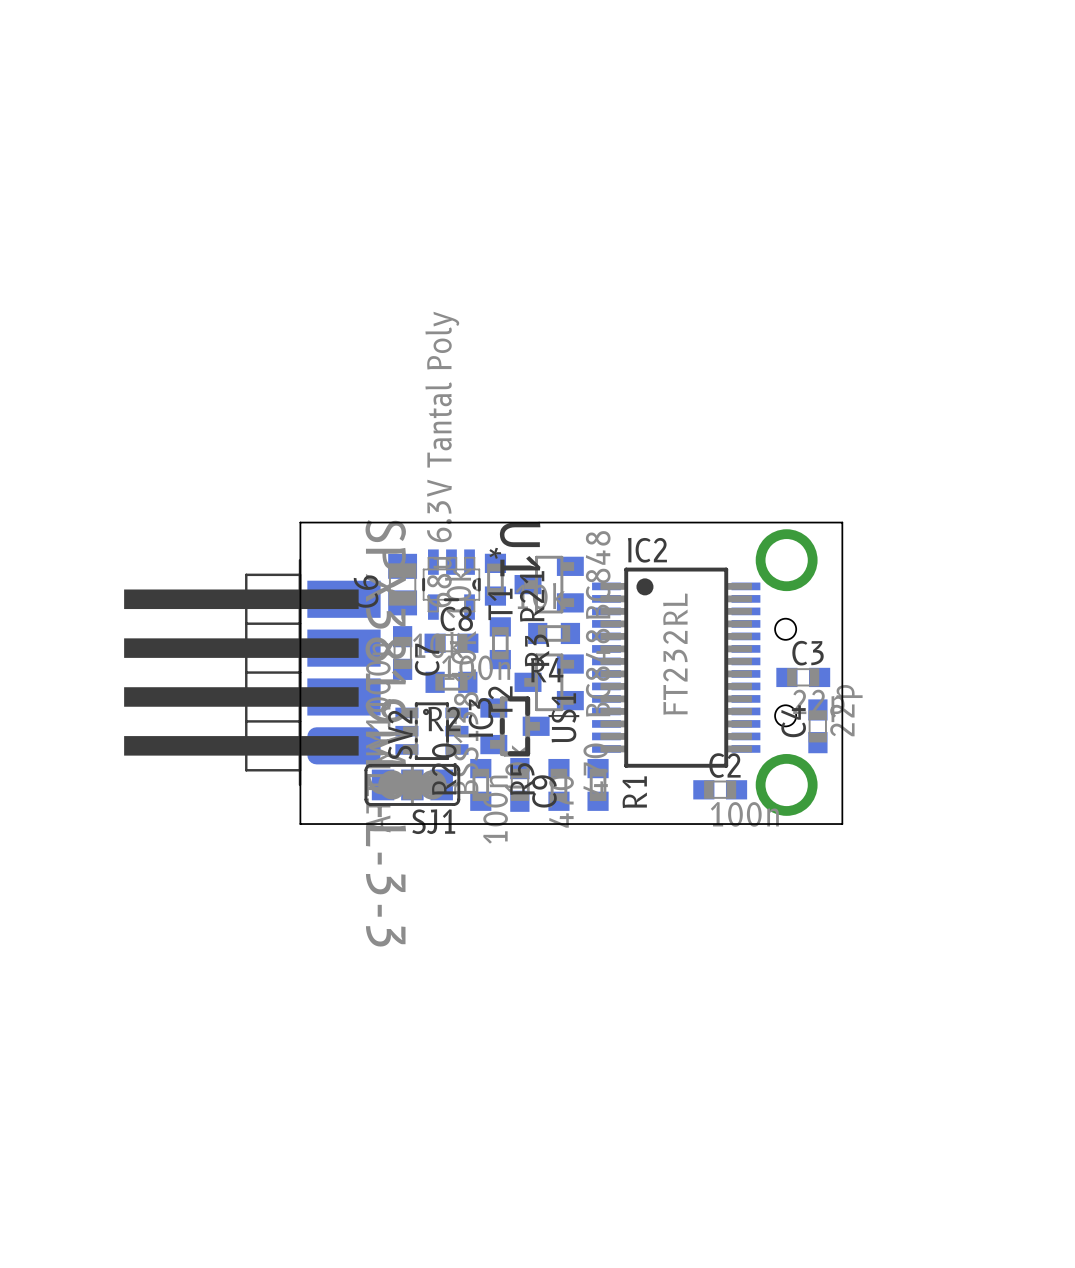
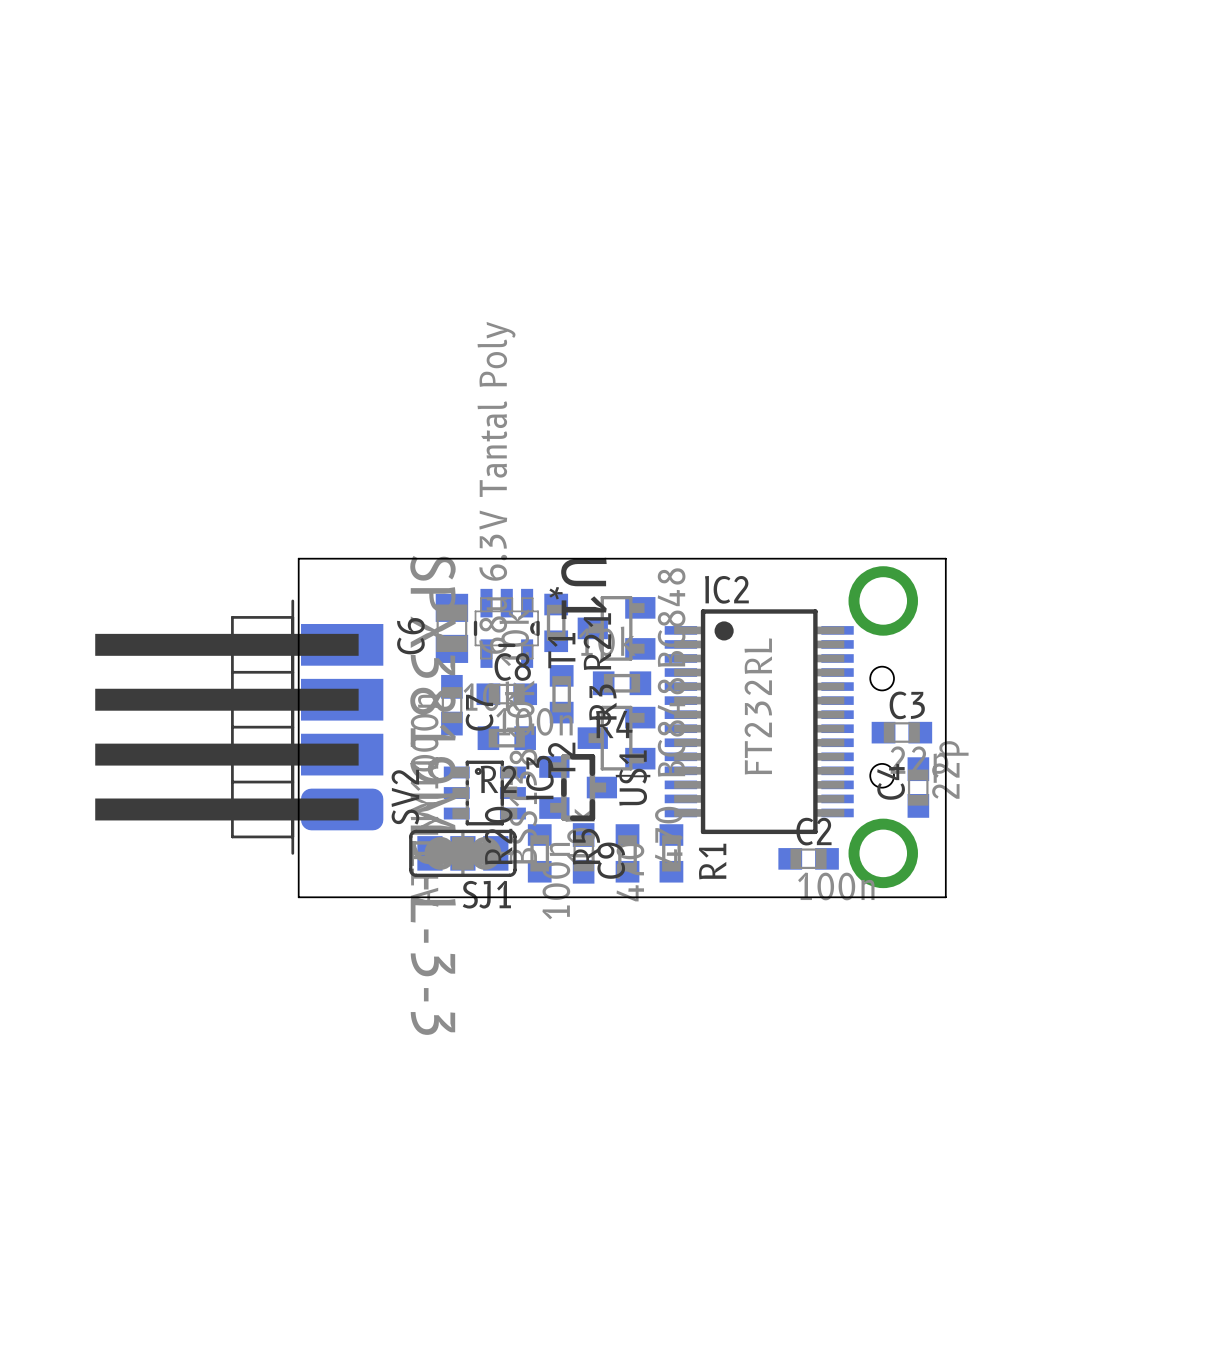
board edge: (300, 522) (300, 824) -> (337, 558) (298, 558) (298, 897) (337, 897)
SV2 position: (252, 672) -> (239, 727)

